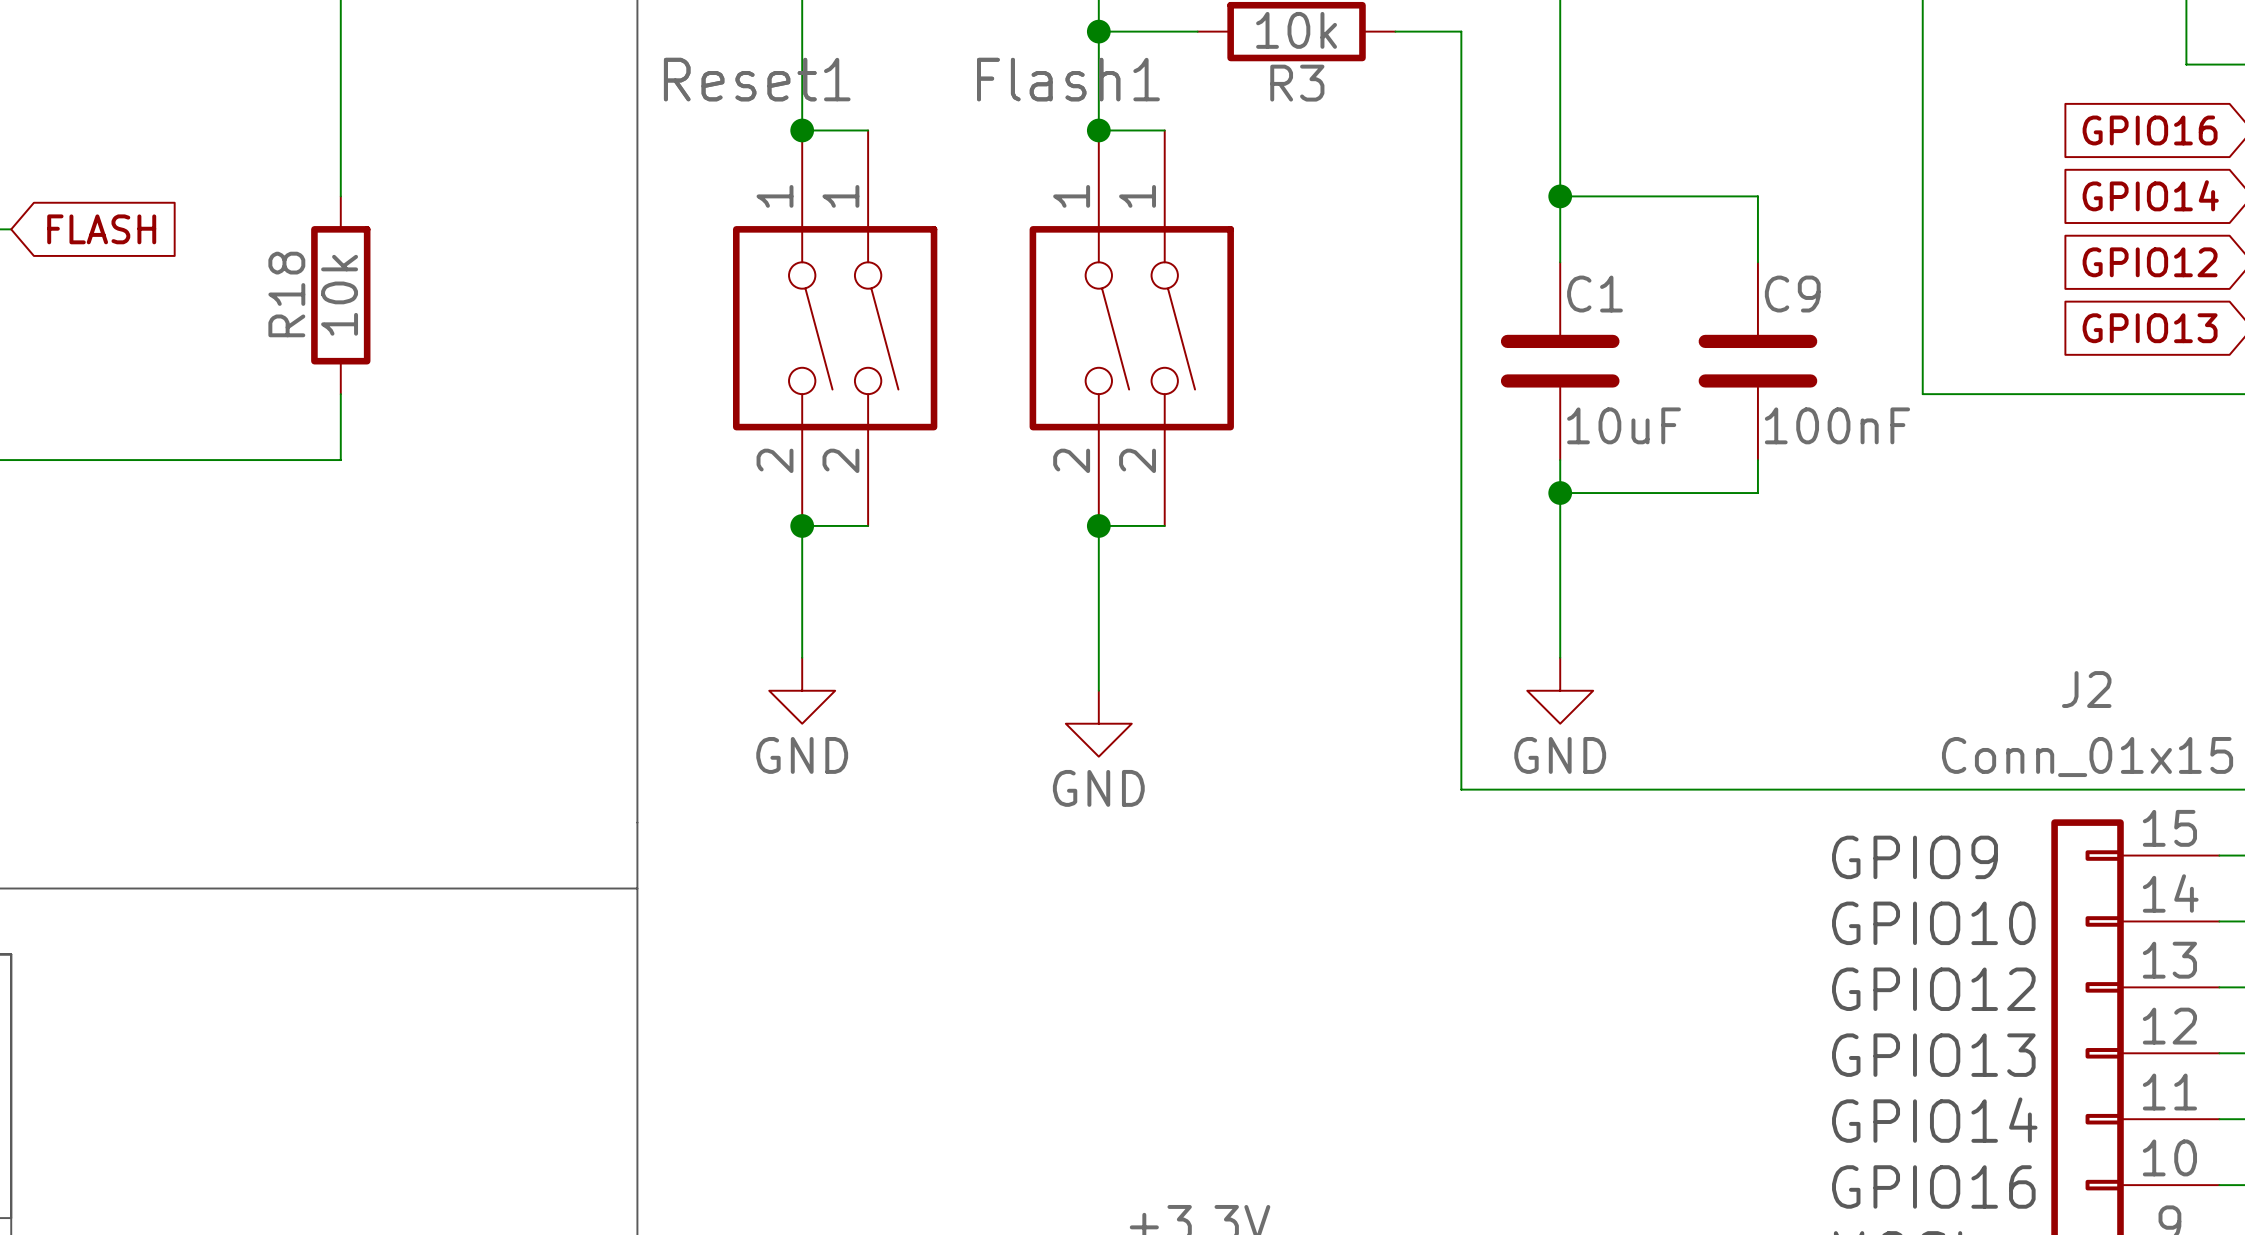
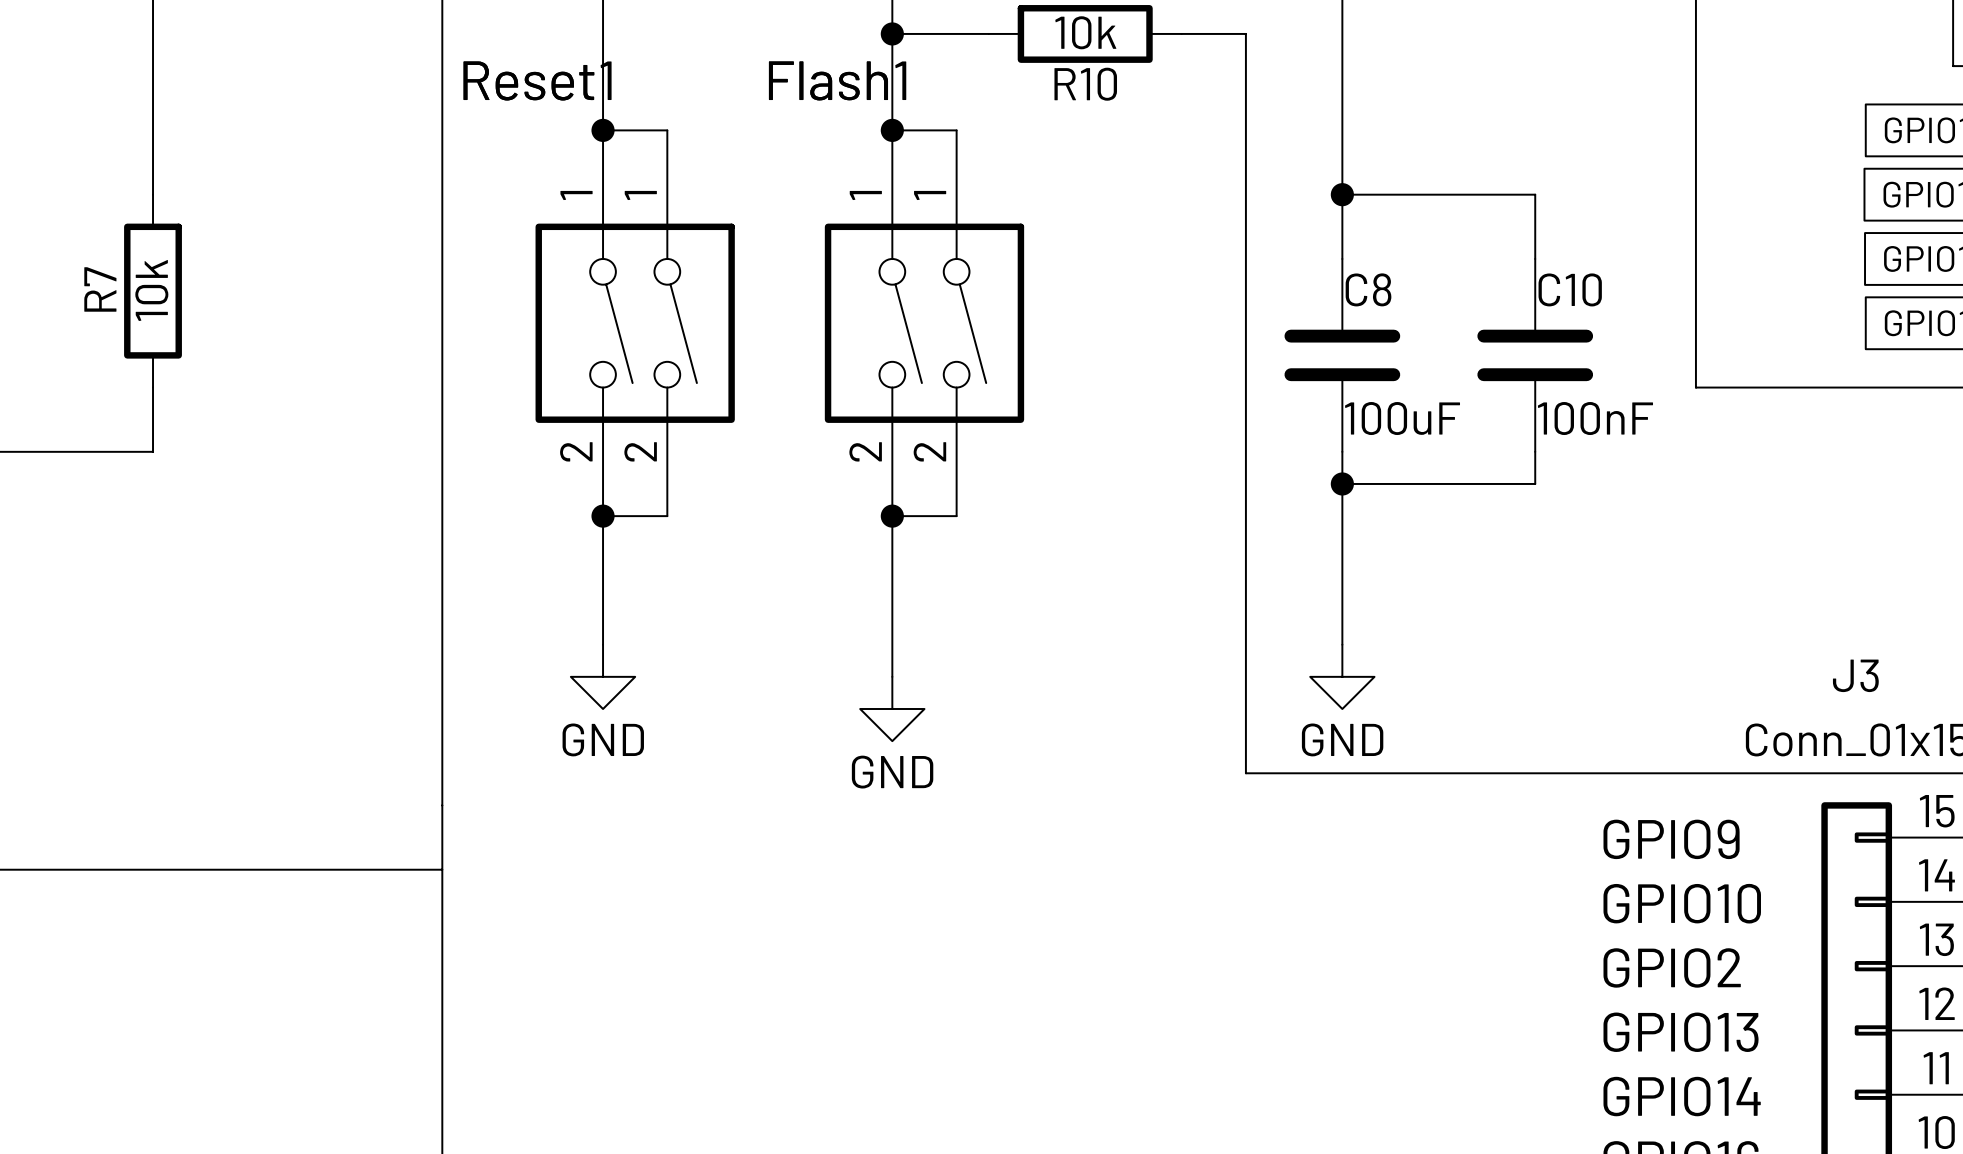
R3 name: R3 (1297, 83) -> R10 (1085, 84)
R18 name: R18 (286, 294) -> R7 (100, 289)
C1 name: C1 (1594, 294) -> C8 (1368, 289)
C9 name: C9 (1792, 294) -> C10 (1570, 289)
C1 value: 10uF (1624, 425) -> 100uF (1402, 418)
J2 name: J2 (2086, 689) -> J3 (1855, 675)
text: GPIO12 (1933, 989) -> GPIO2 (1672, 967)

